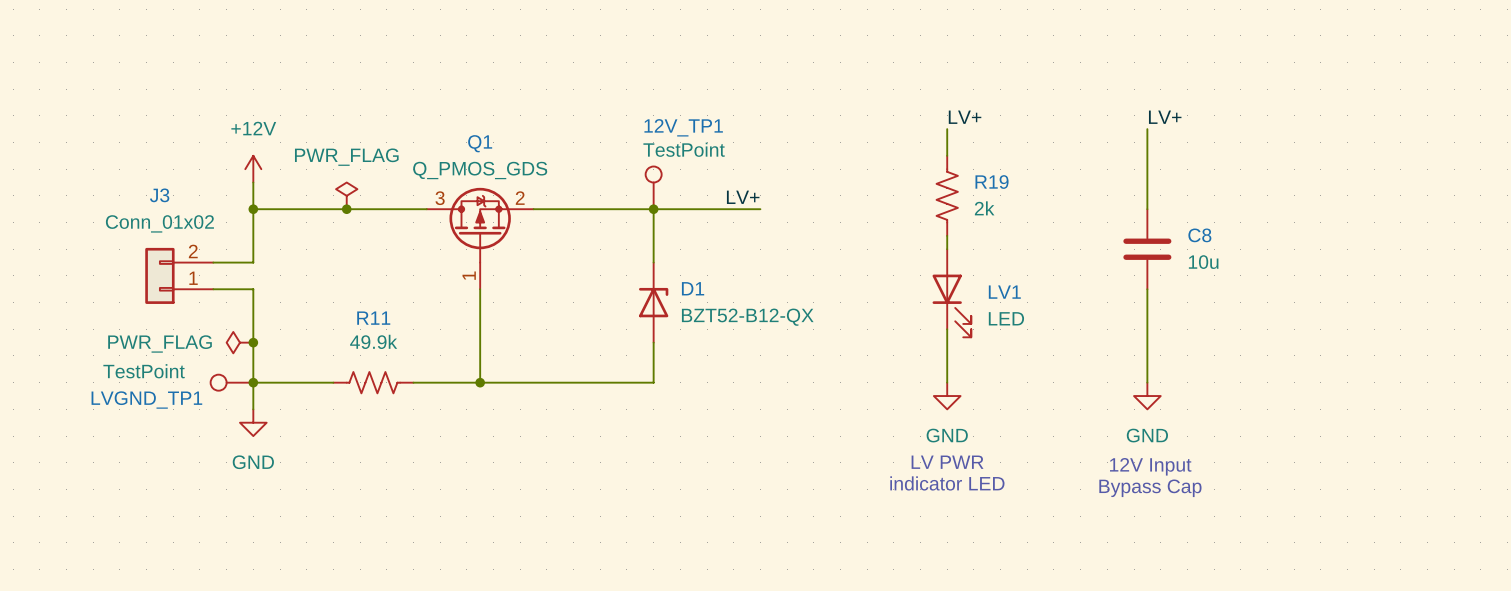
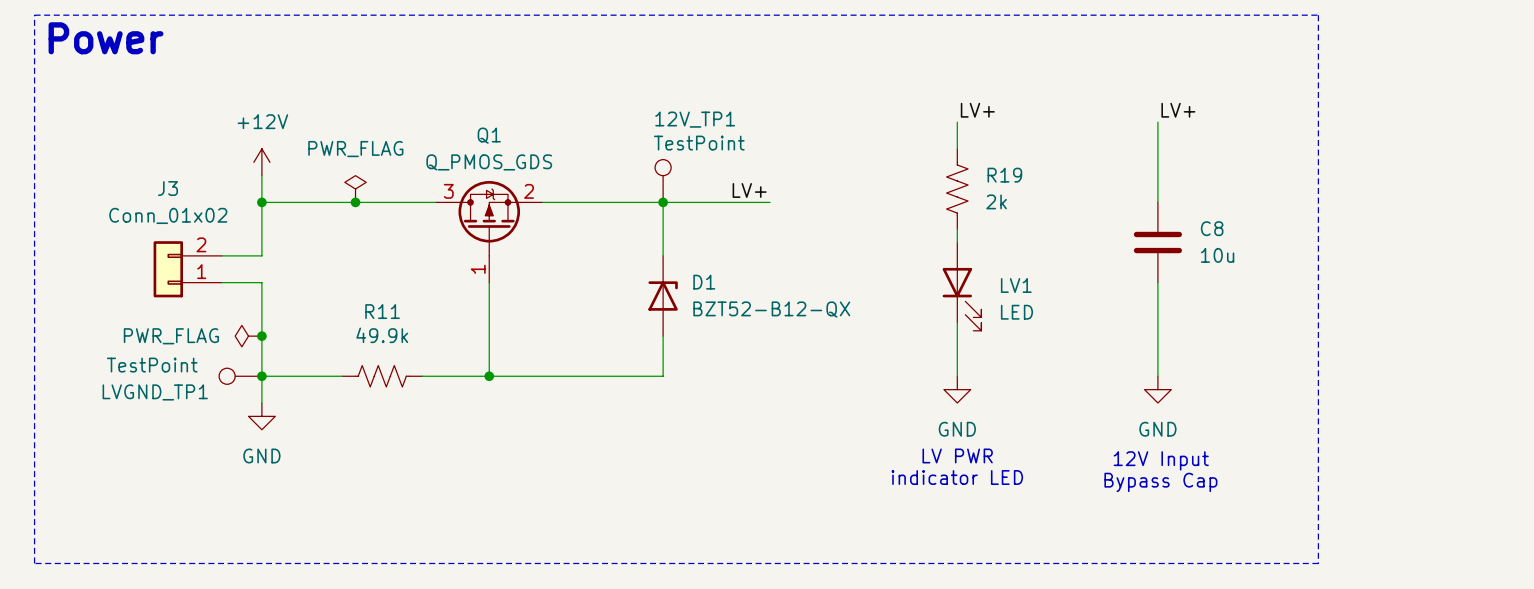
line: none -> (34, 15) (34, 563) (1318, 563) (1318, 15) (34, 15)
text: none -> Power (106, 38)

